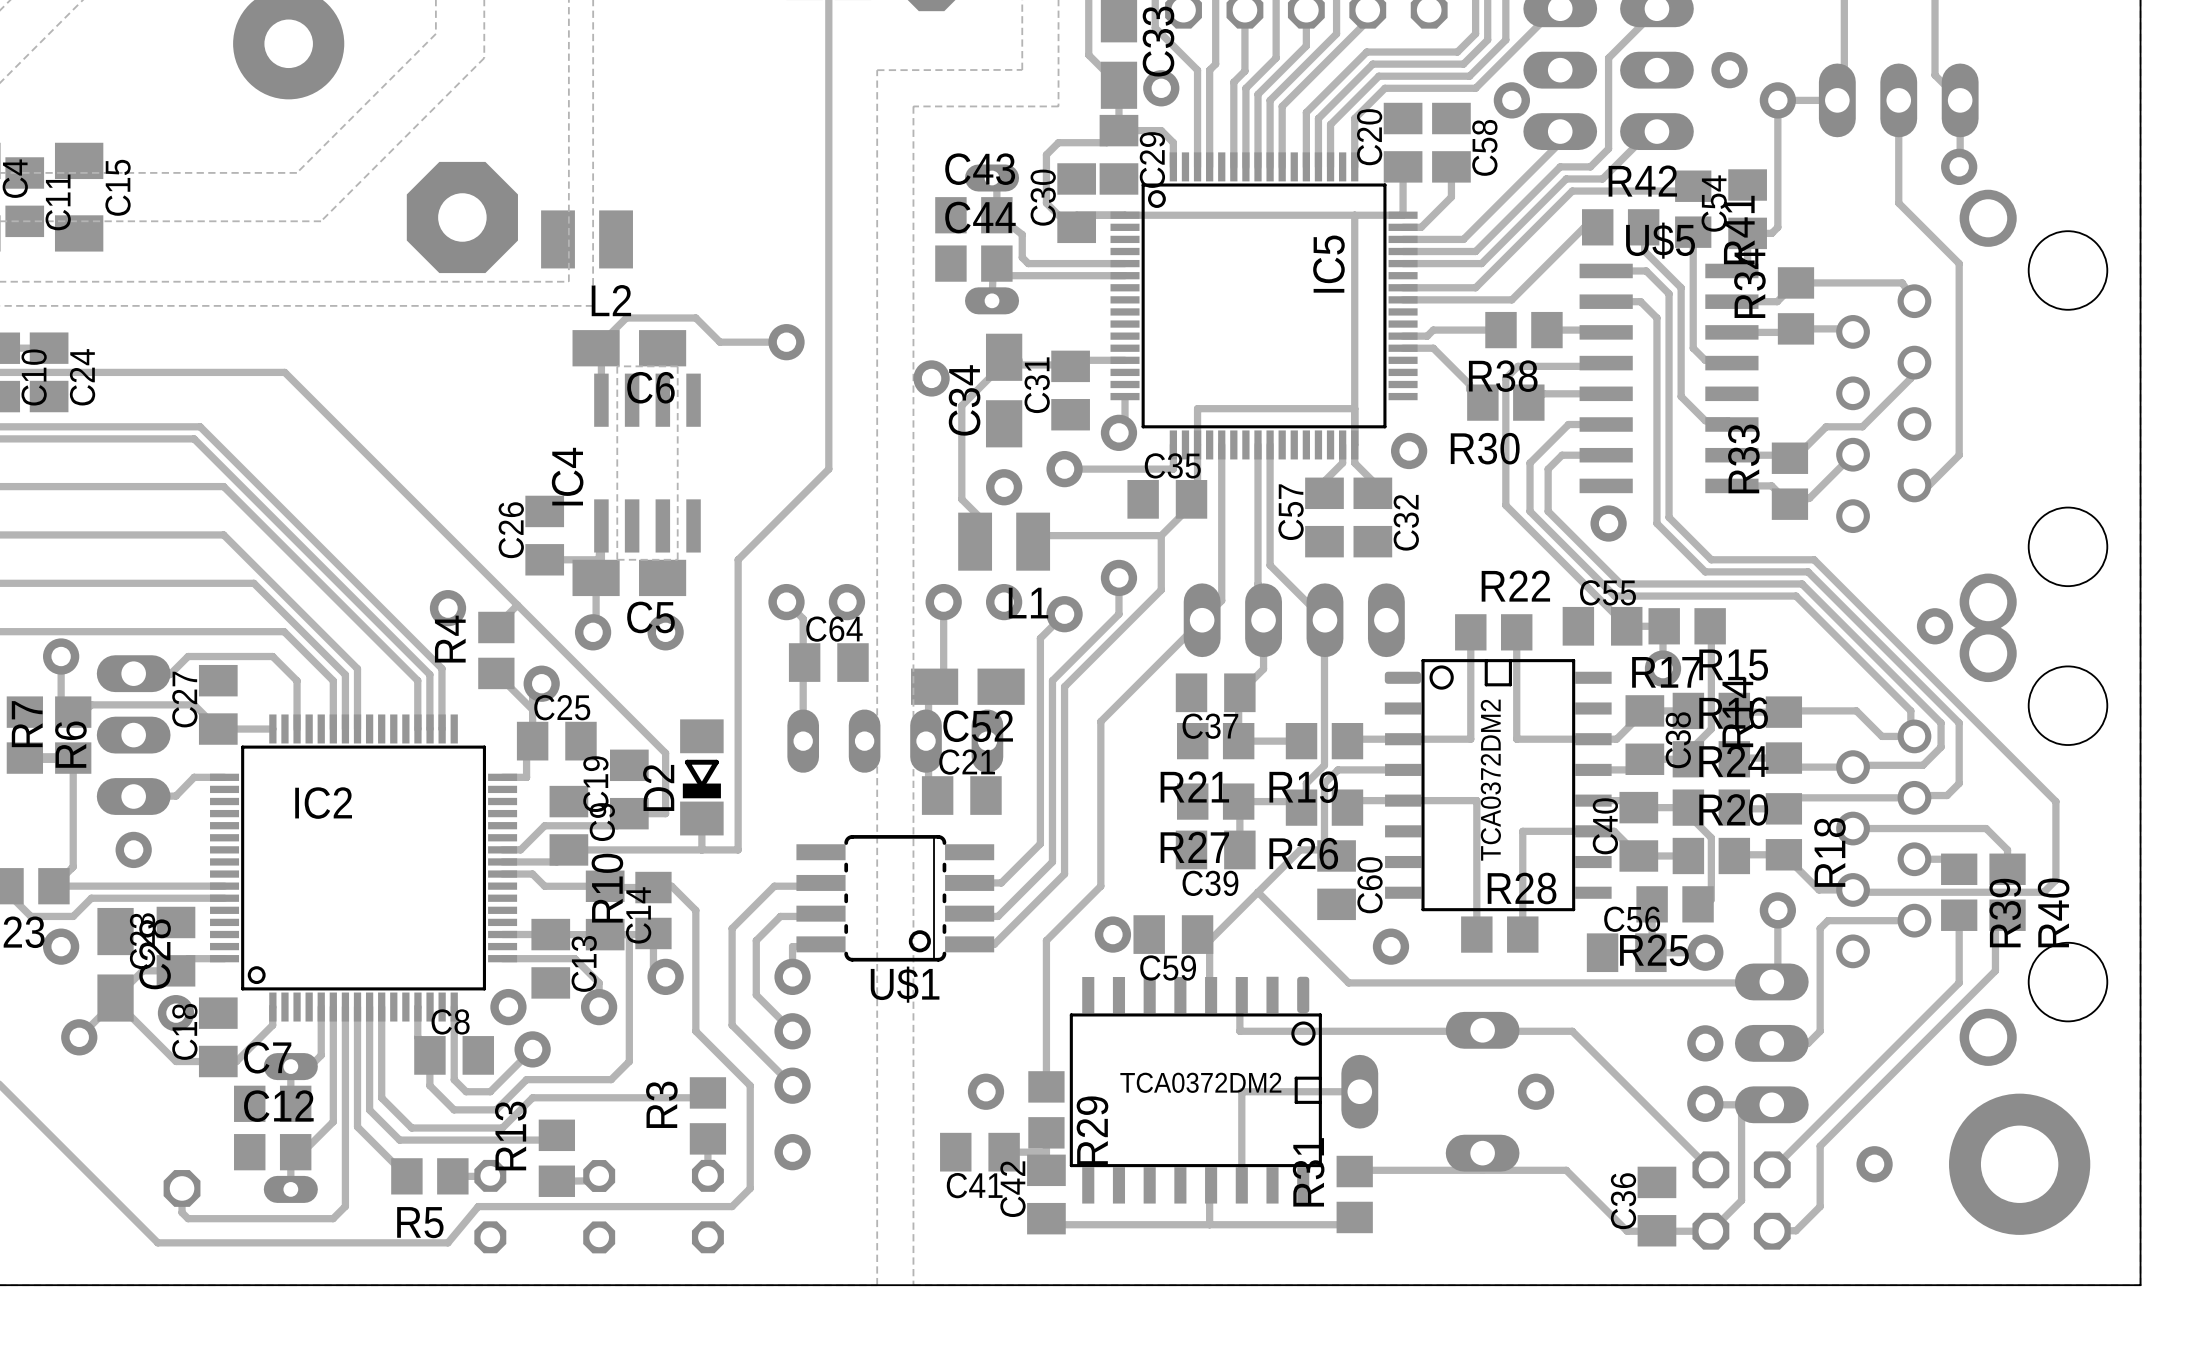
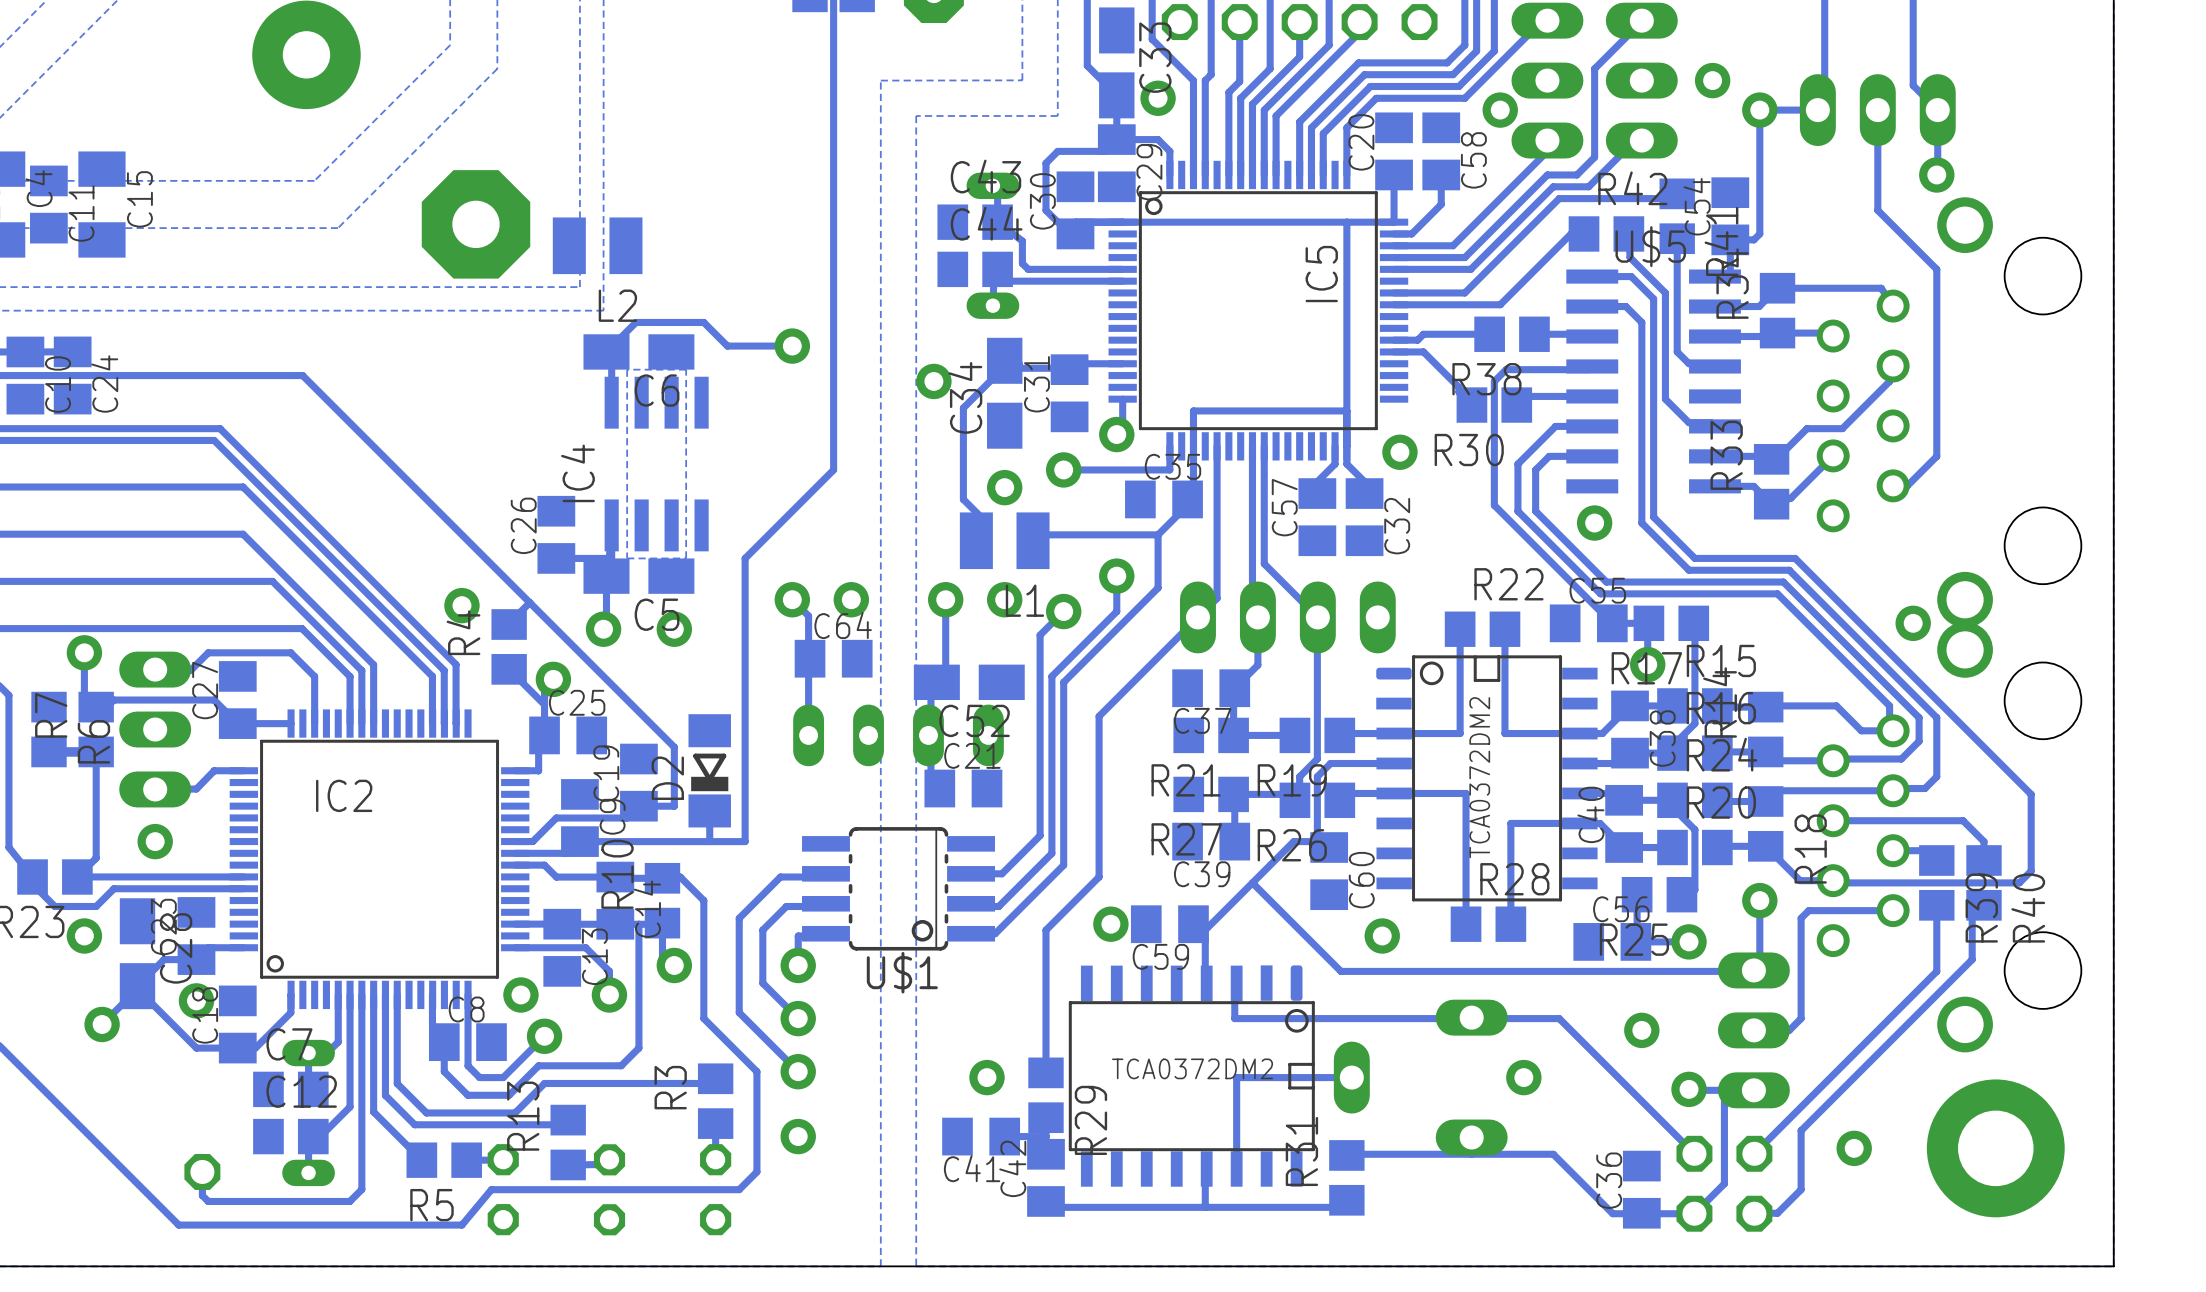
via position: (1705, 1043) -> (1641, 1030)

